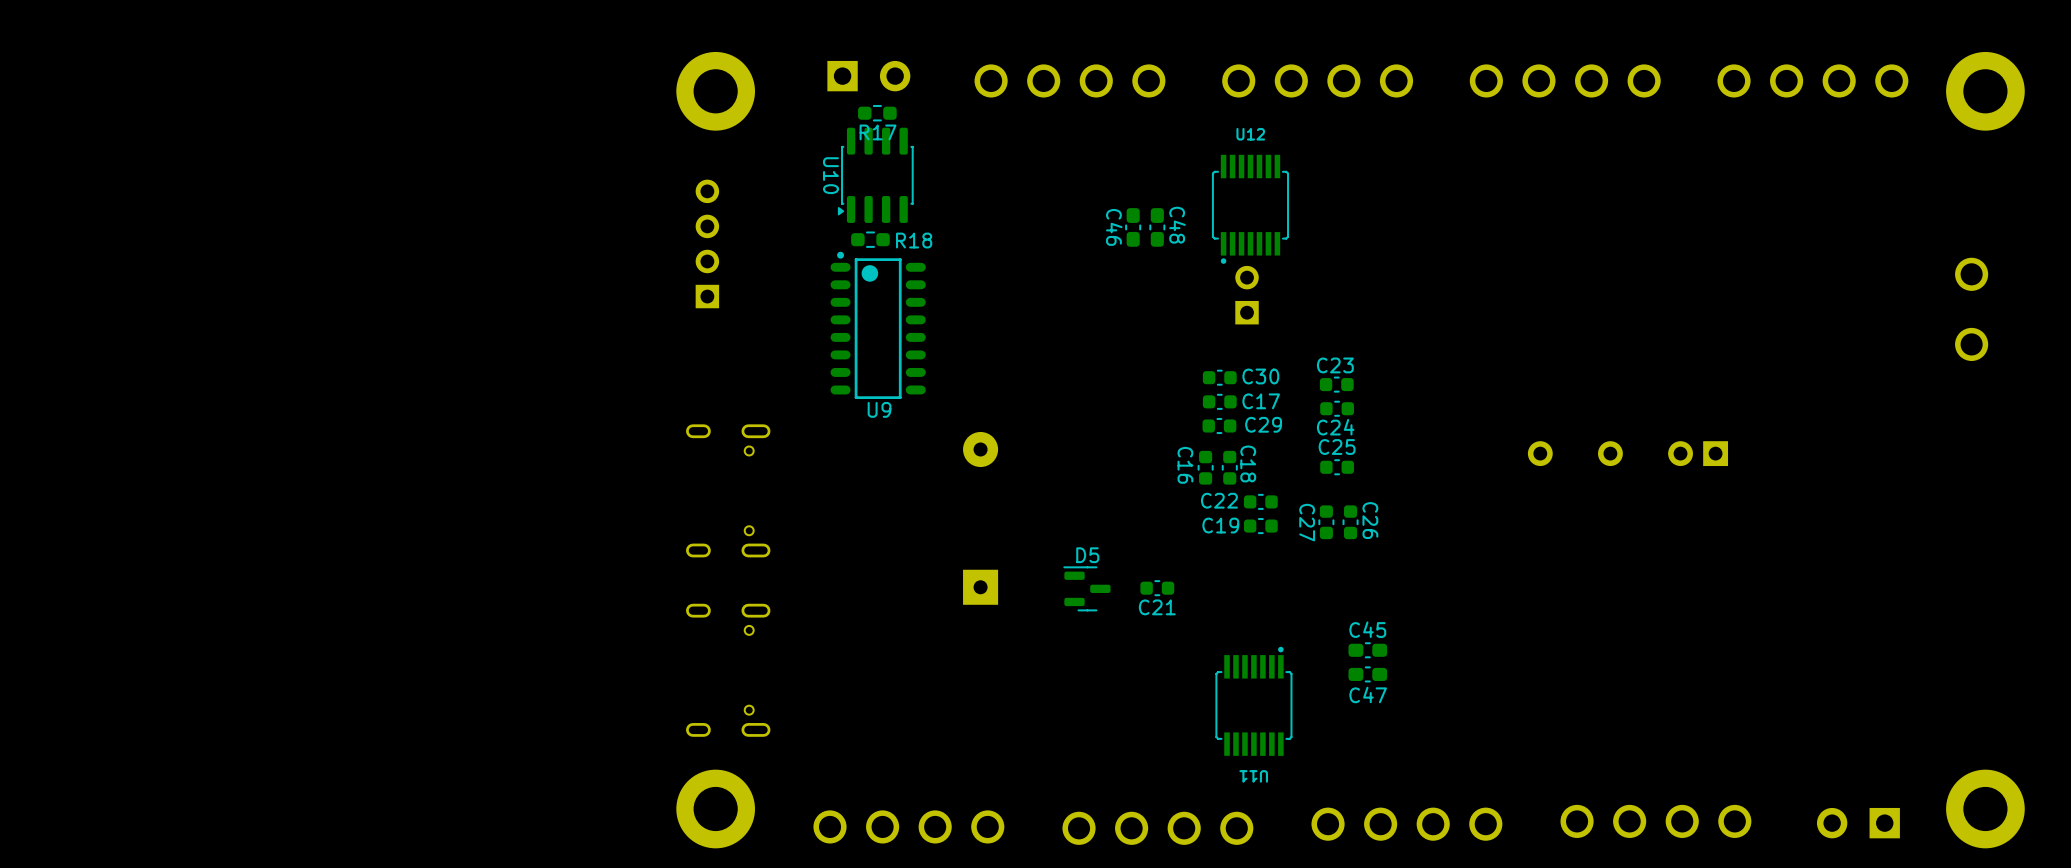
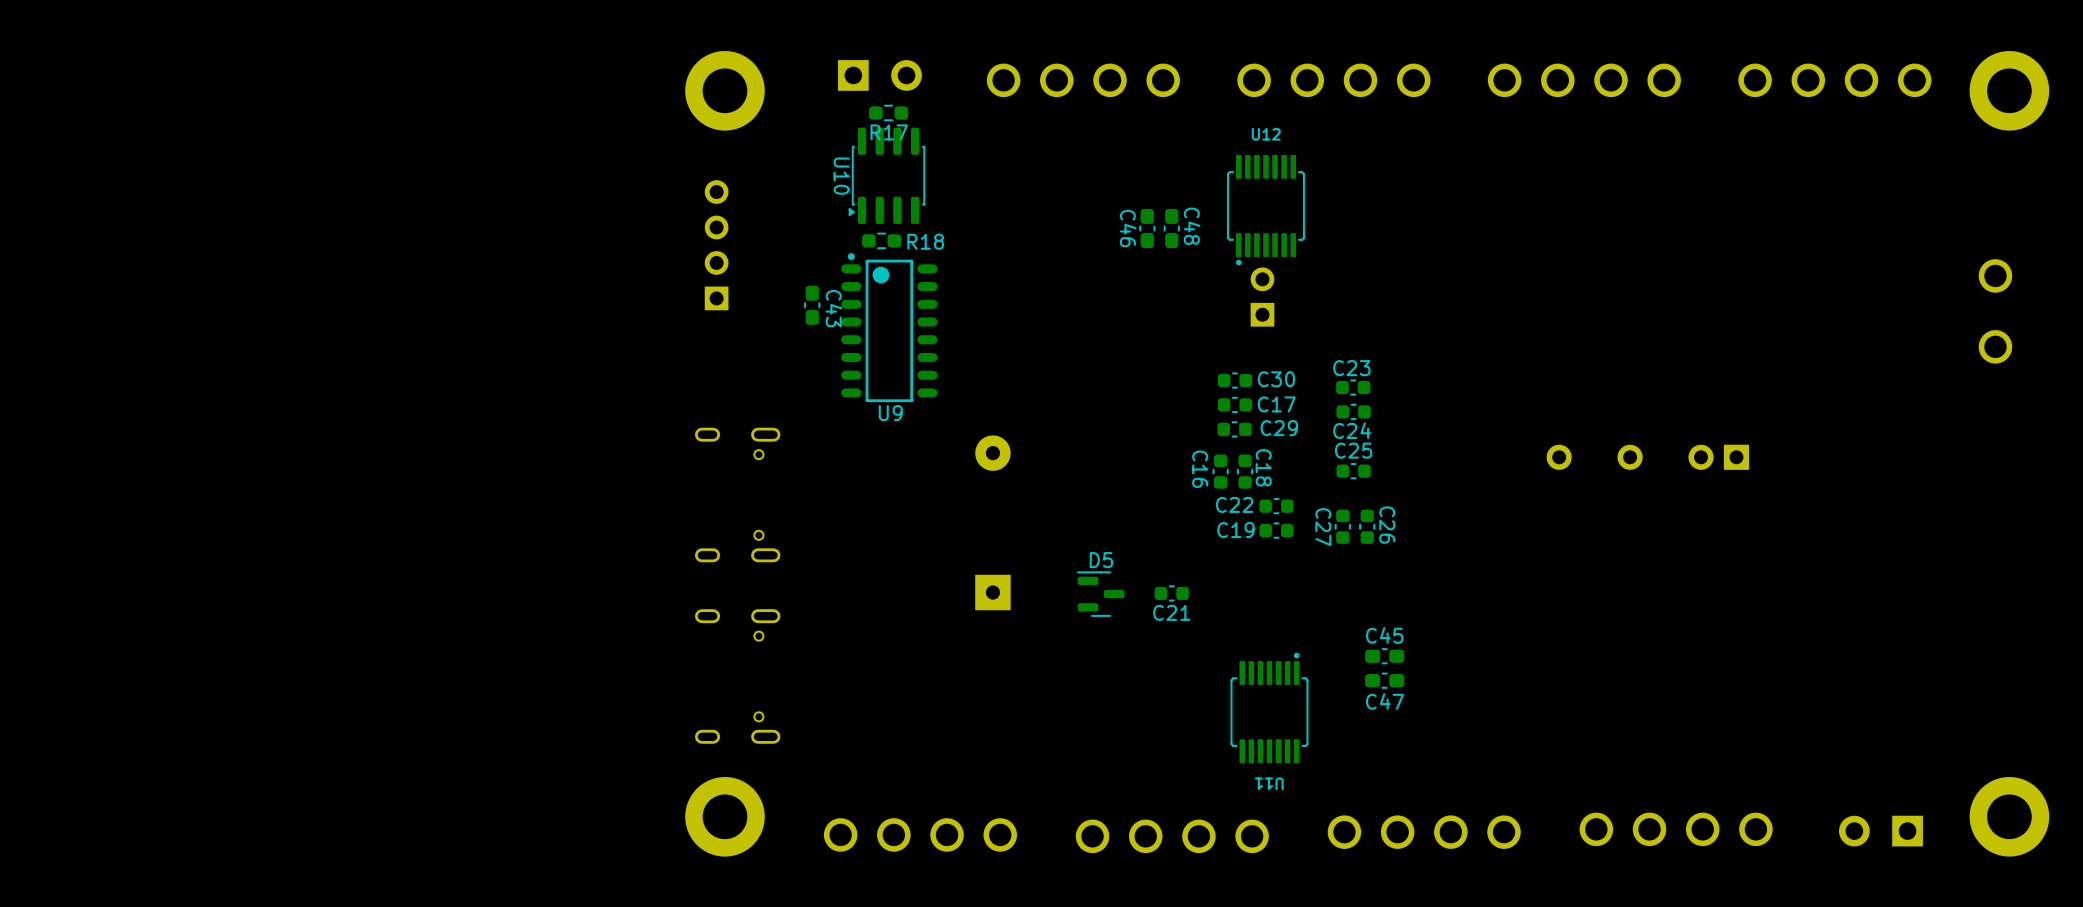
C43: none -> (812, 305)

